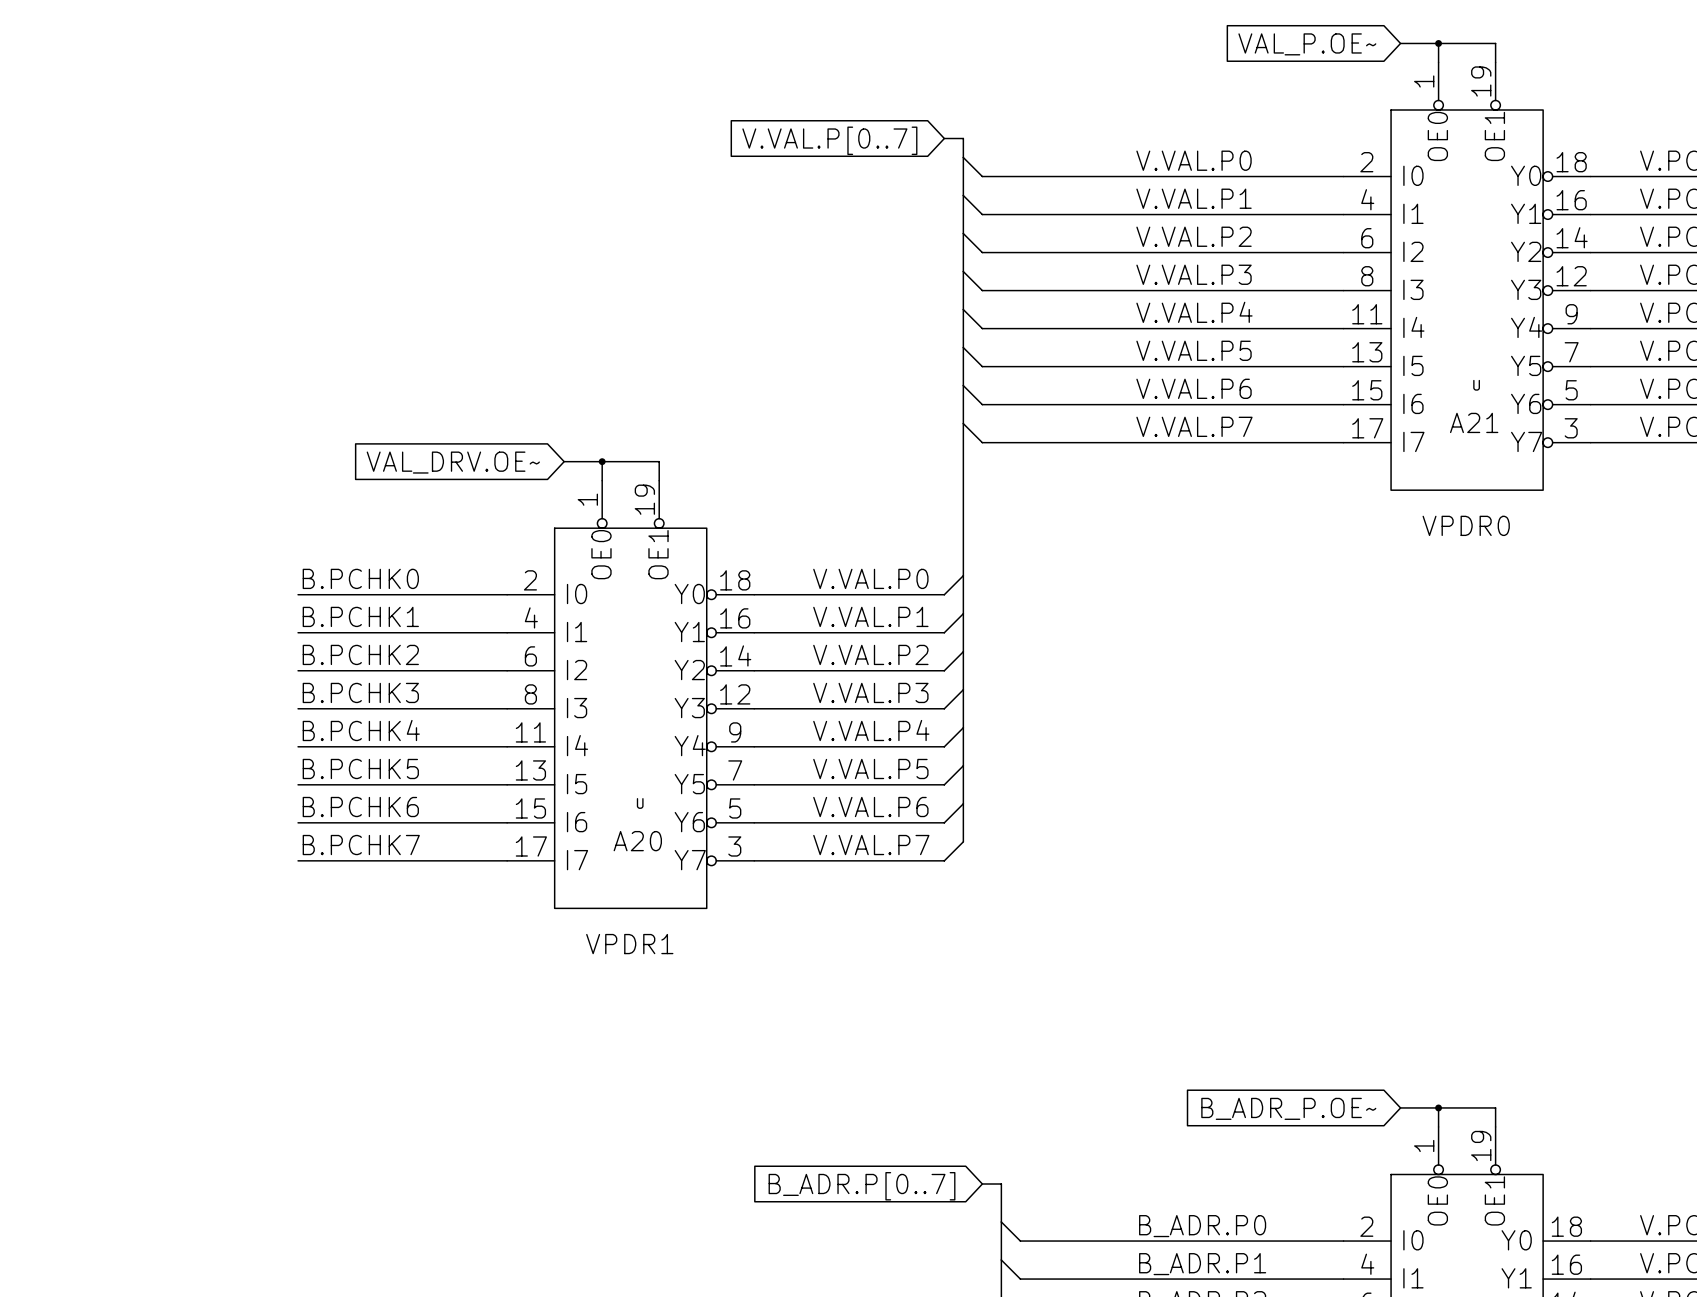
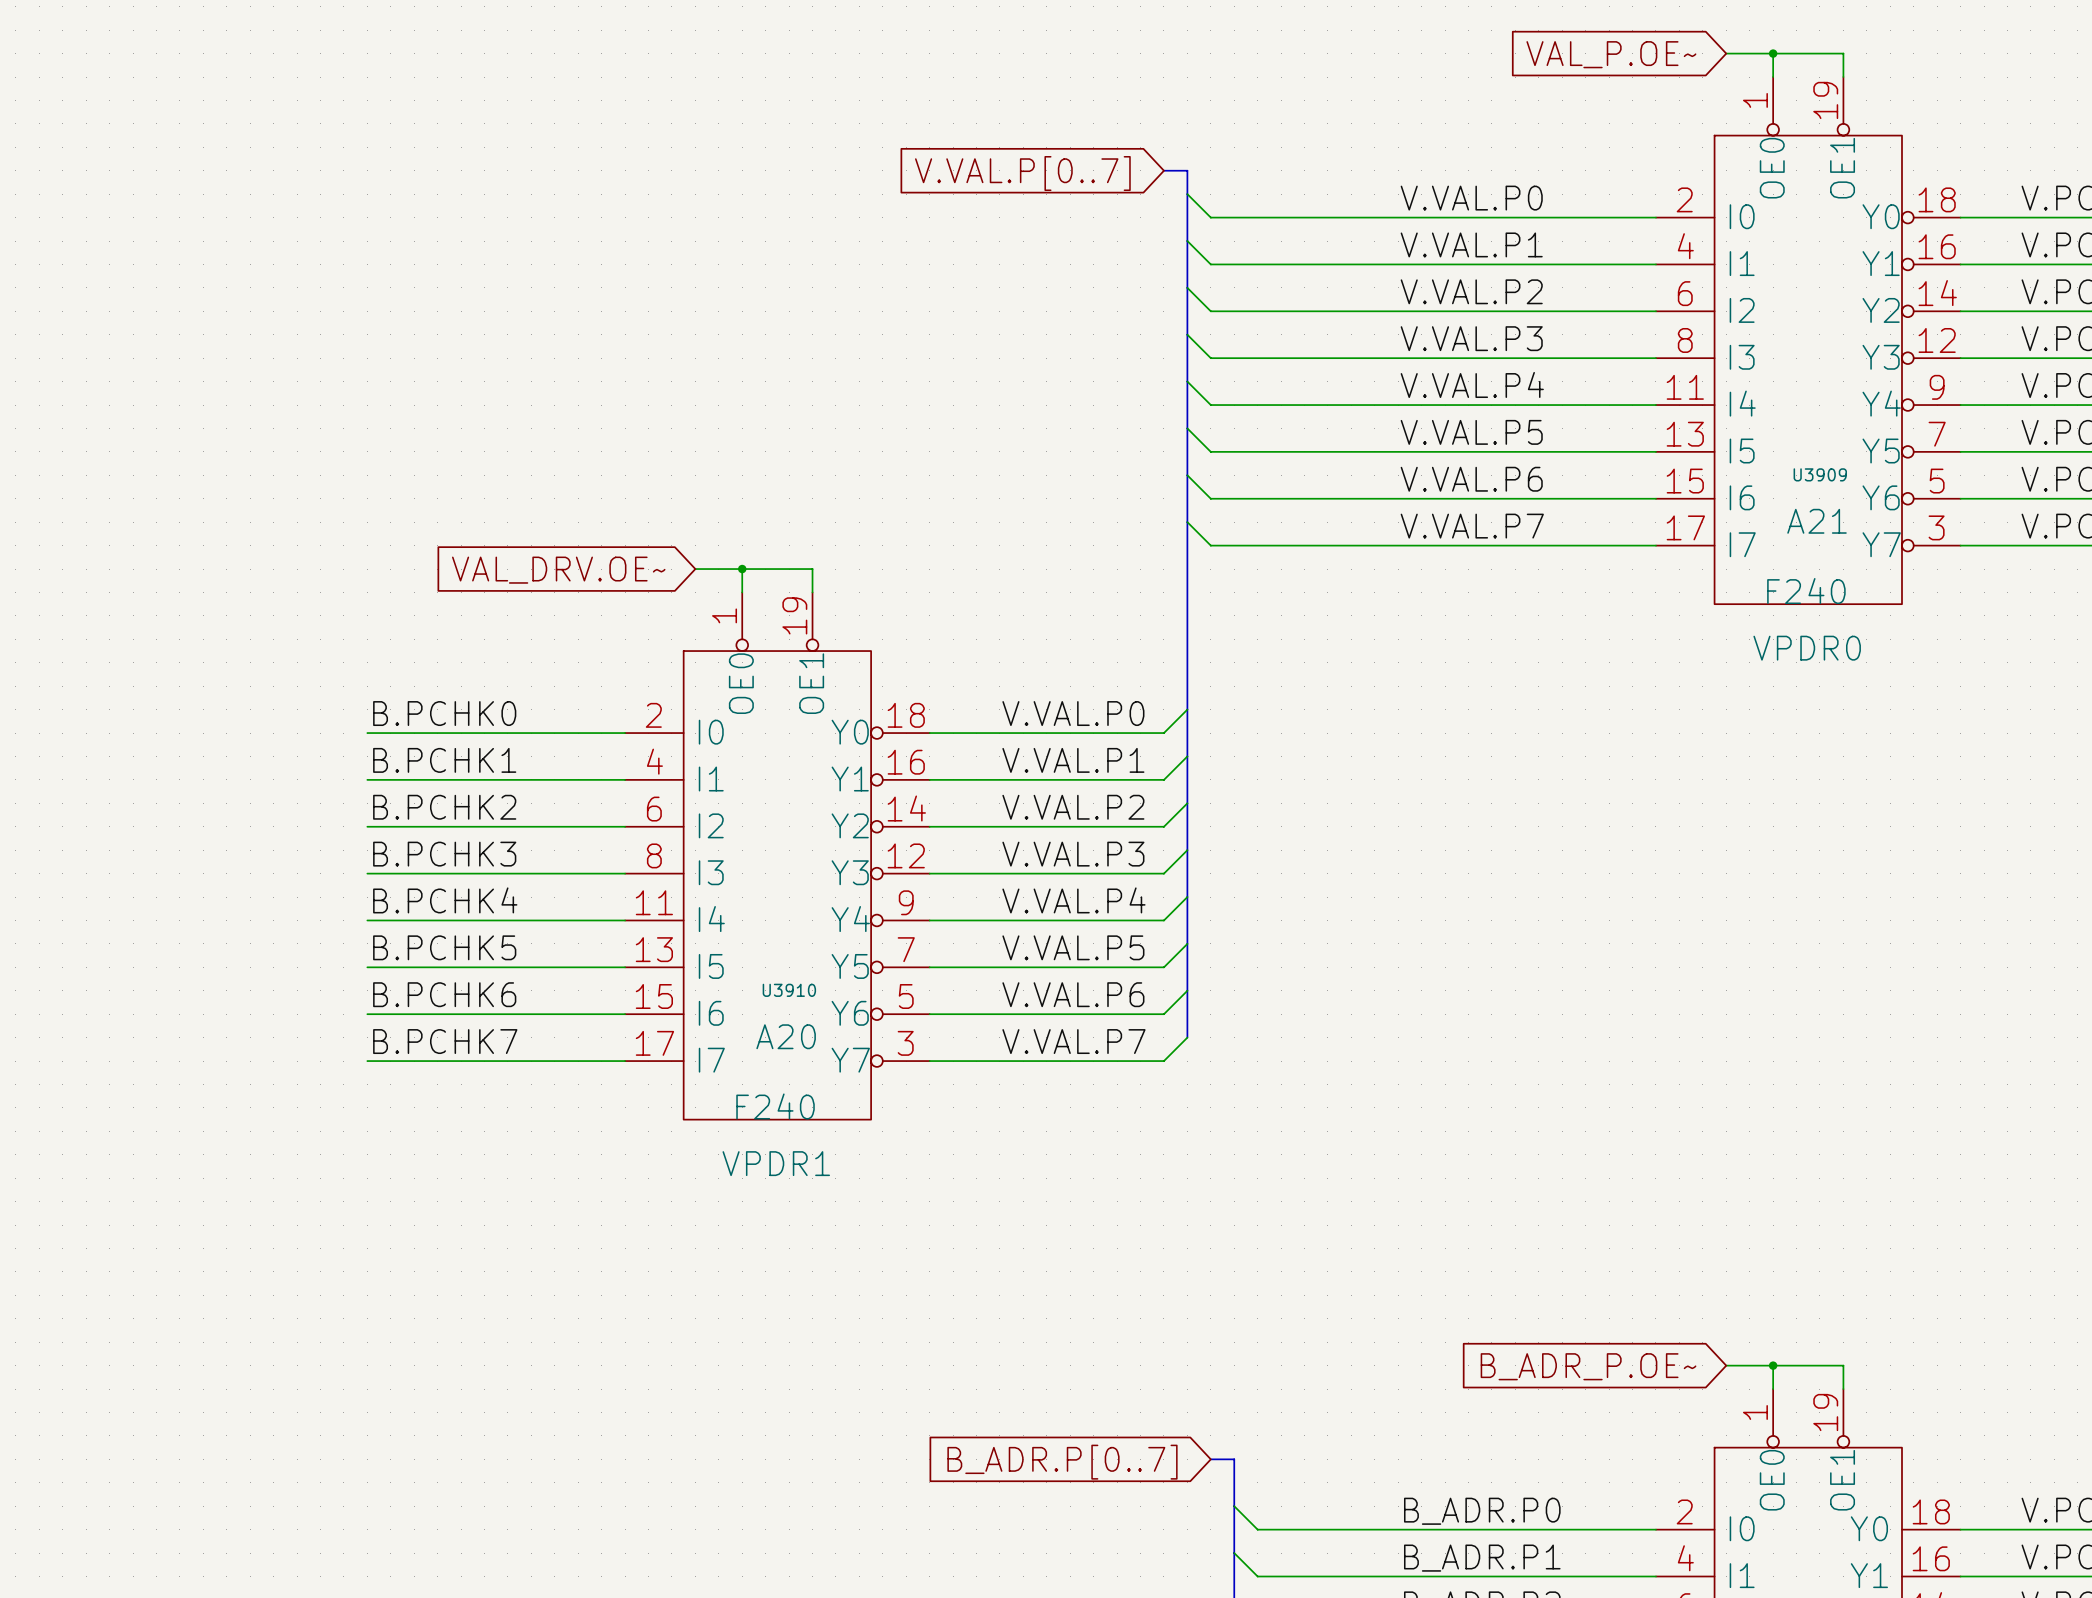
U name: U (1476, 385) -> U3909 (1820, 474)
U value: none -> F240 (1806, 591)
U name: U (640, 803) -> U3910 (789, 990)
U value: none -> F240 (775, 1106)

